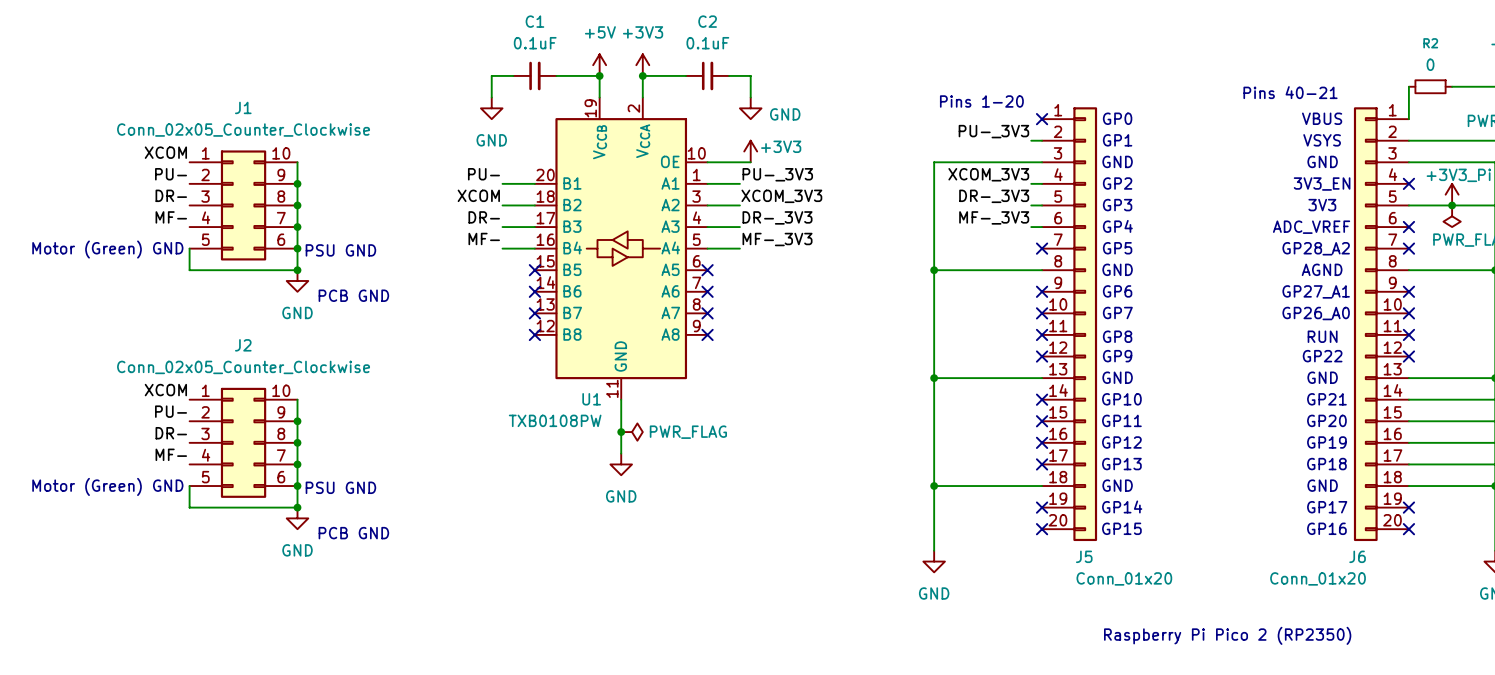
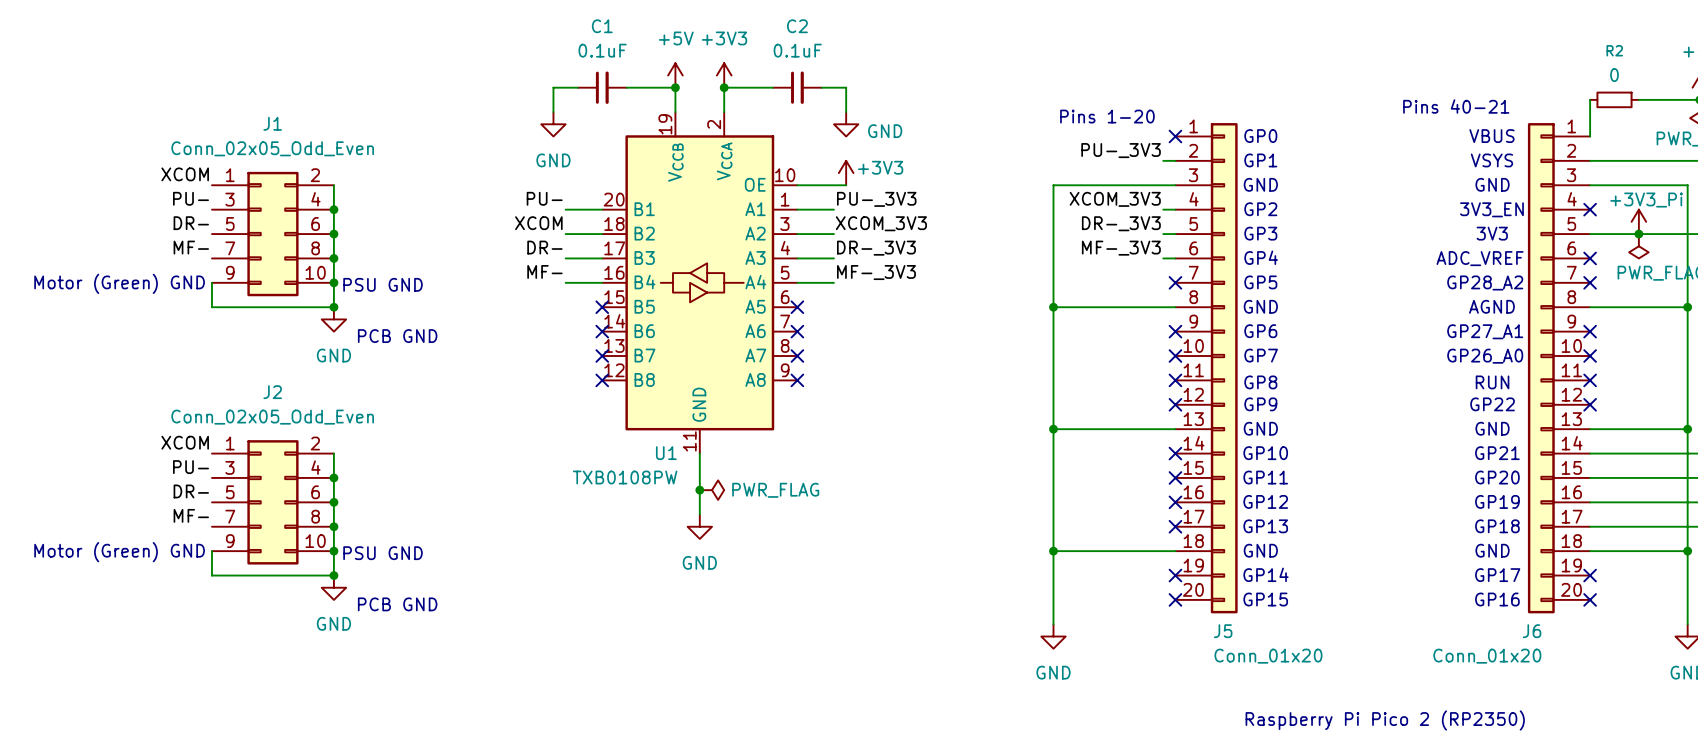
J1 value: Conn_02x05_Counter_Clockwise (243, 130) -> Conn_02x05_Odd_Even (272, 148)
J1 symbol: [189, 150, 298, 261] -> [211, 171, 334, 297]
J2 value: Conn_02x05_Counter_Clockwise (243, 367) -> Conn_02x05_Odd_Even (272, 417)
J2 symbol: [189, 387, 298, 498] -> [211, 440, 334, 565]

